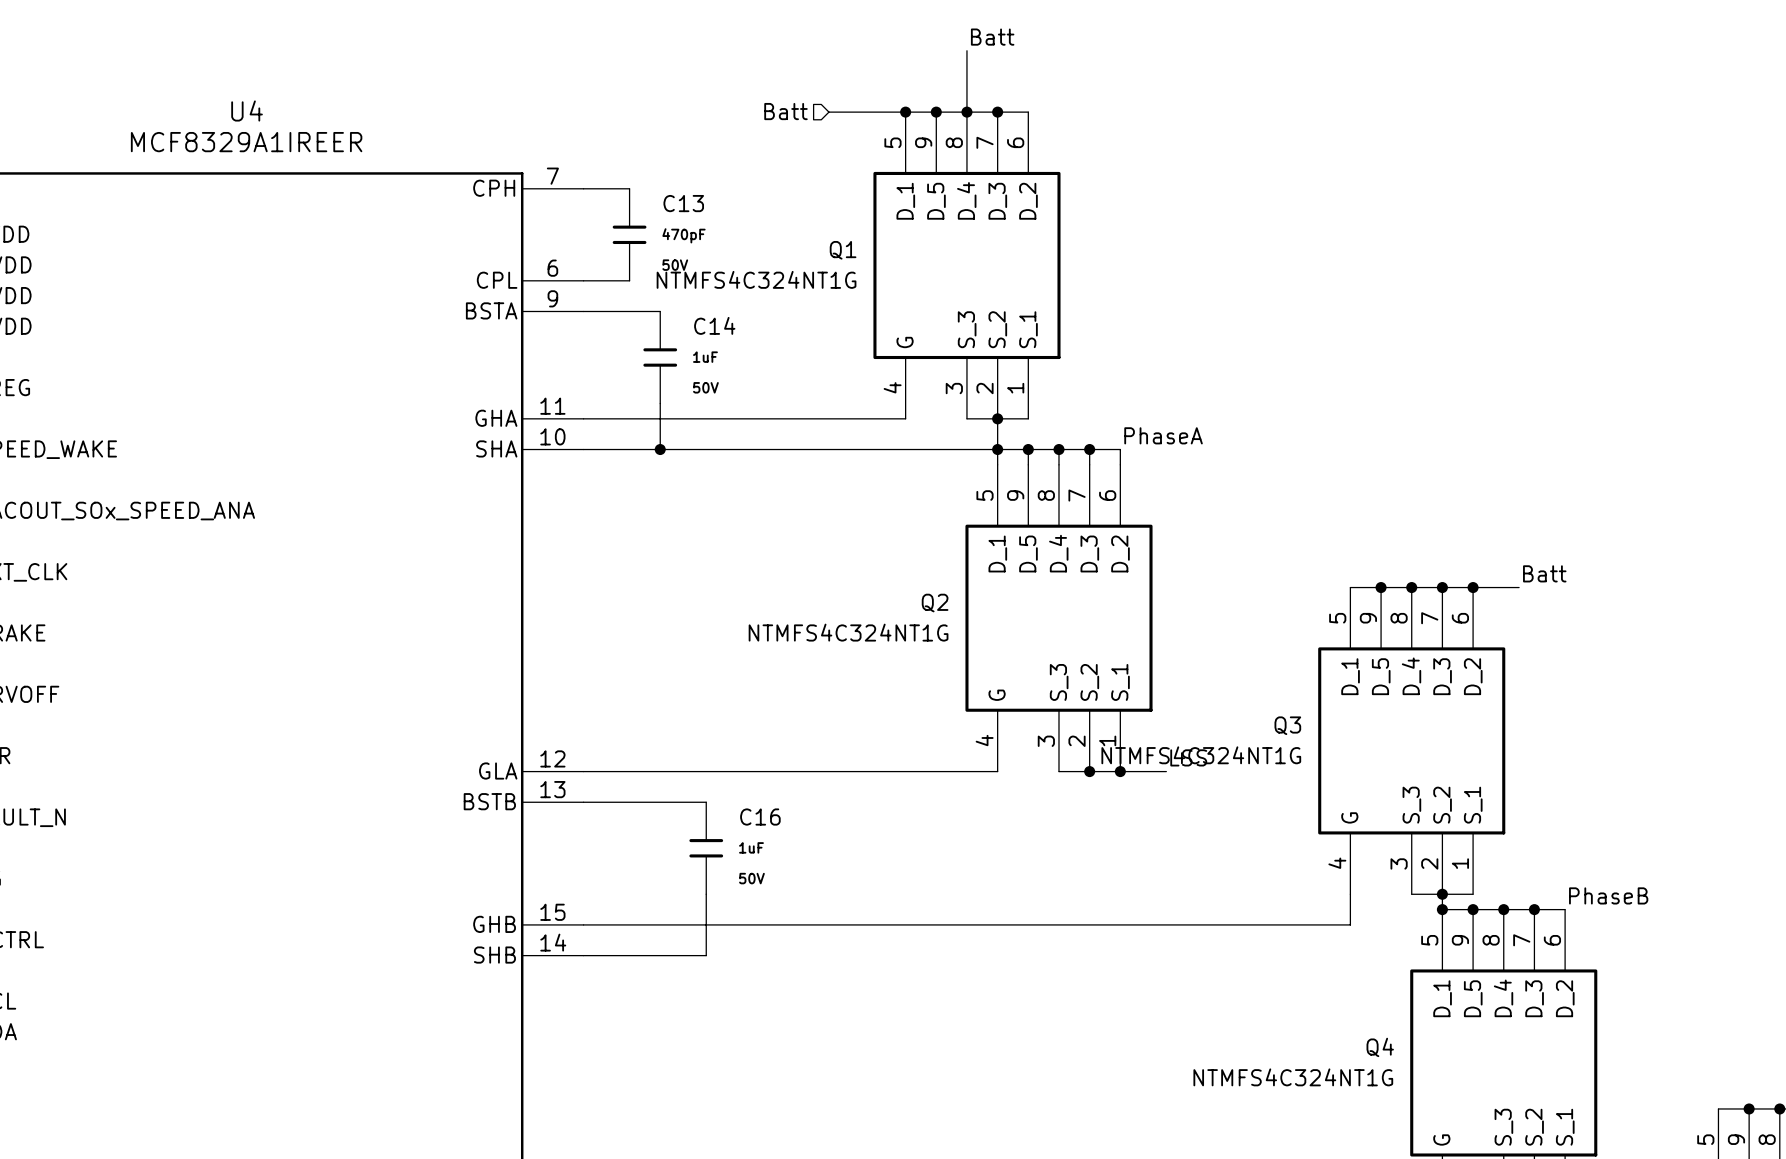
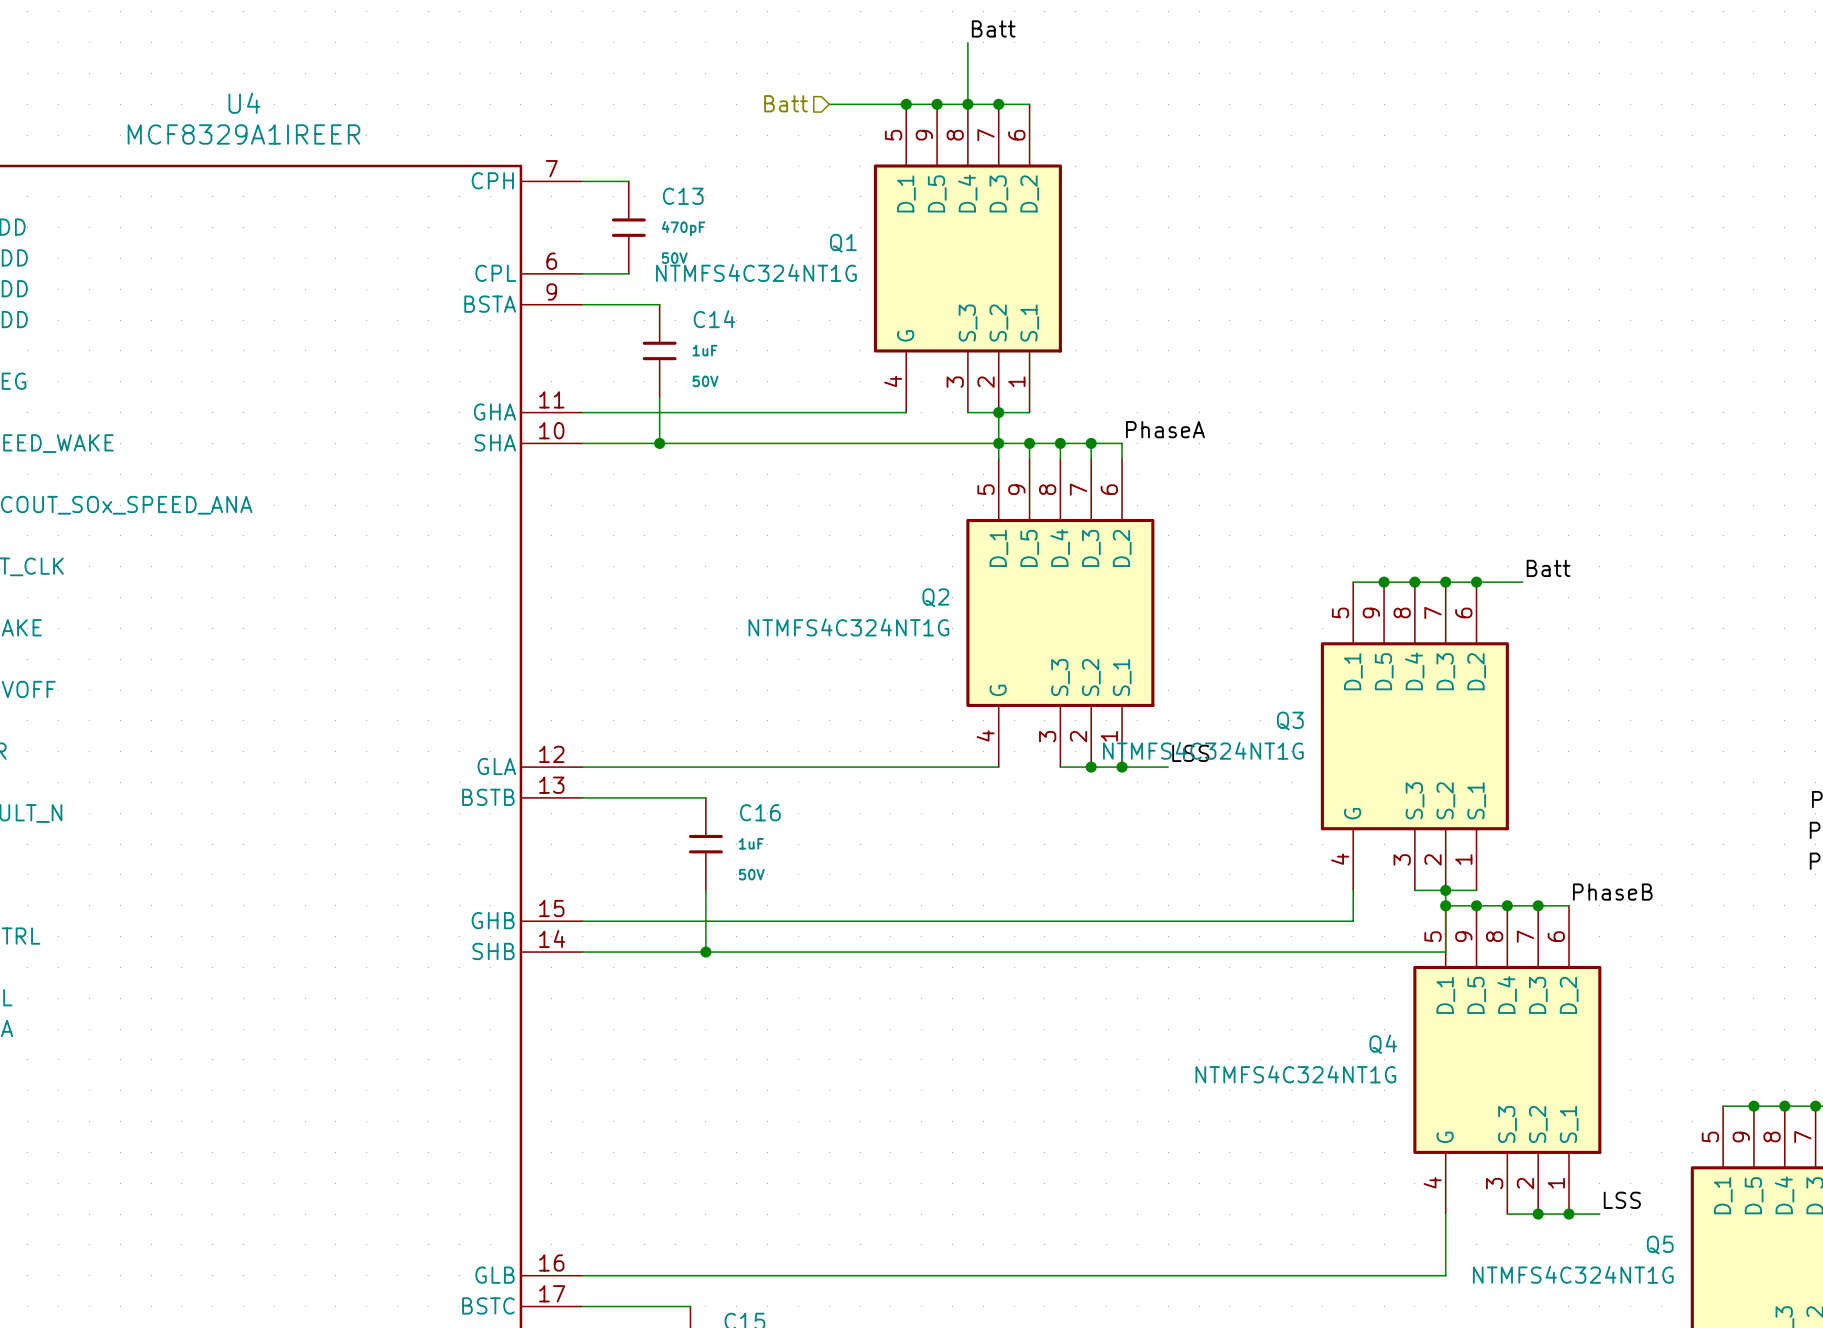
wire: none -> (1445, 905) (1445, 952) (705, 952)
junction: none -> (705, 952)

